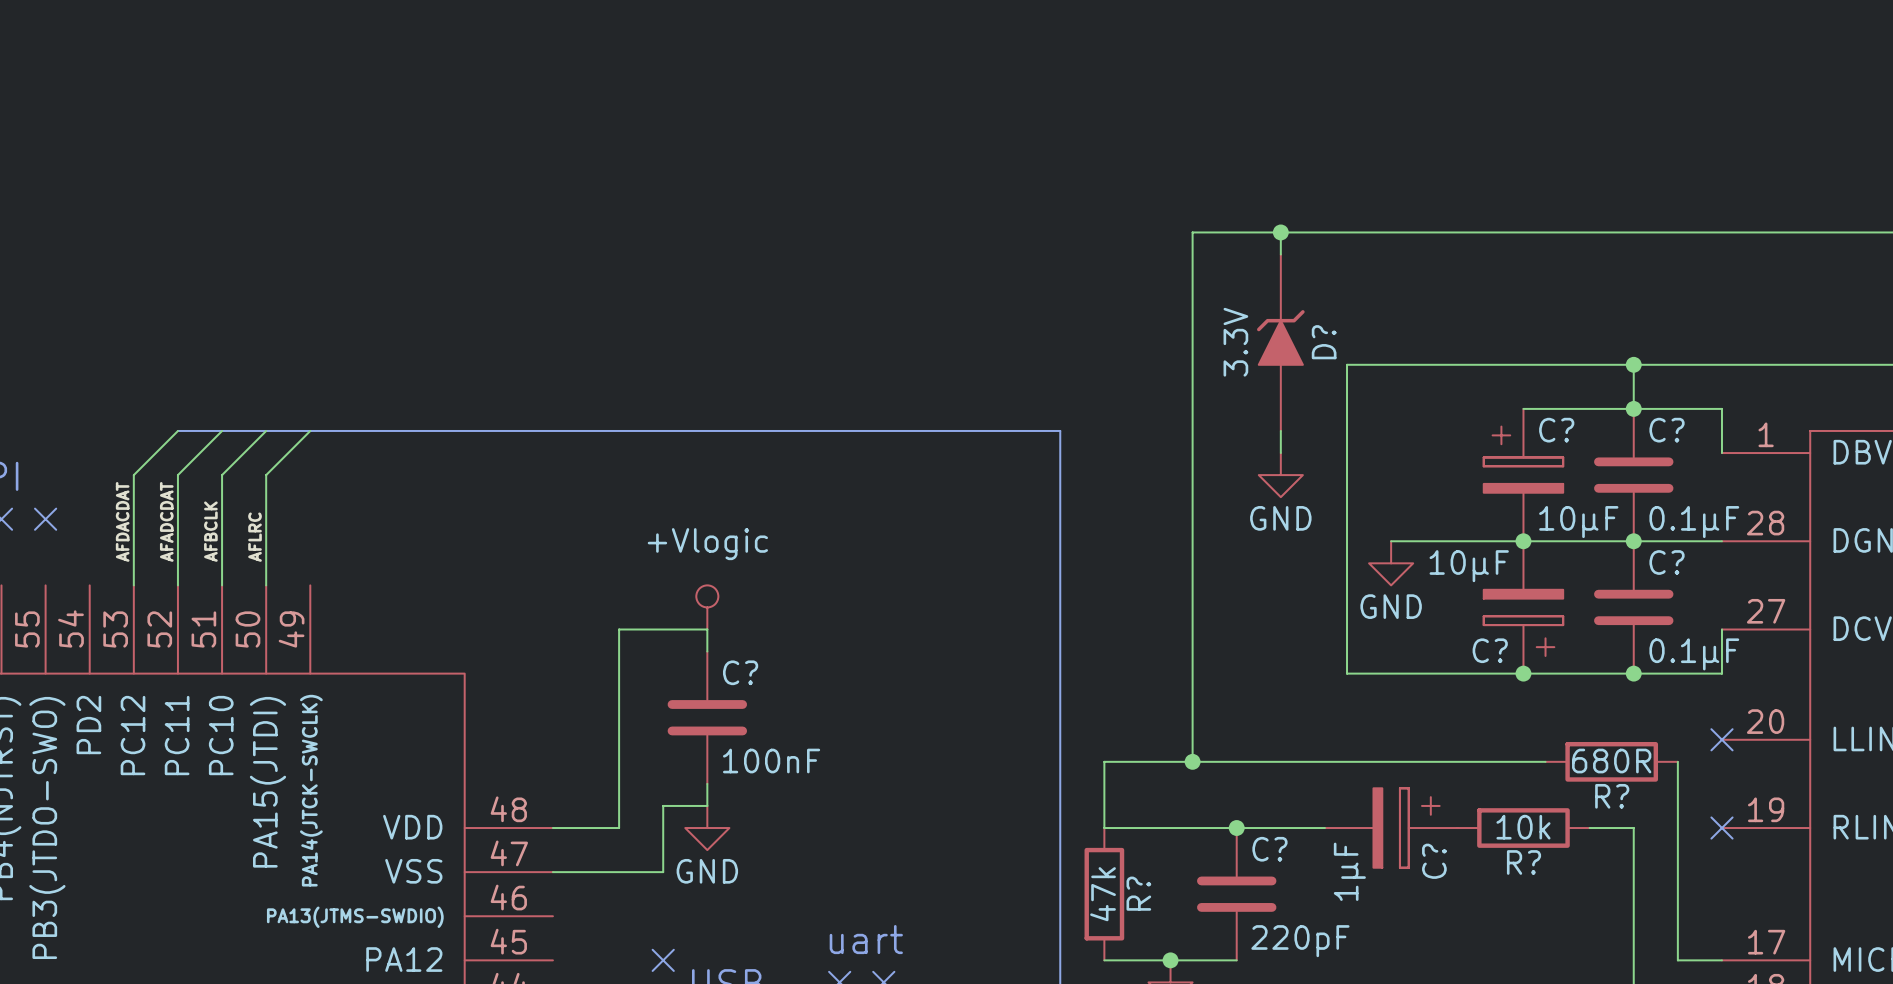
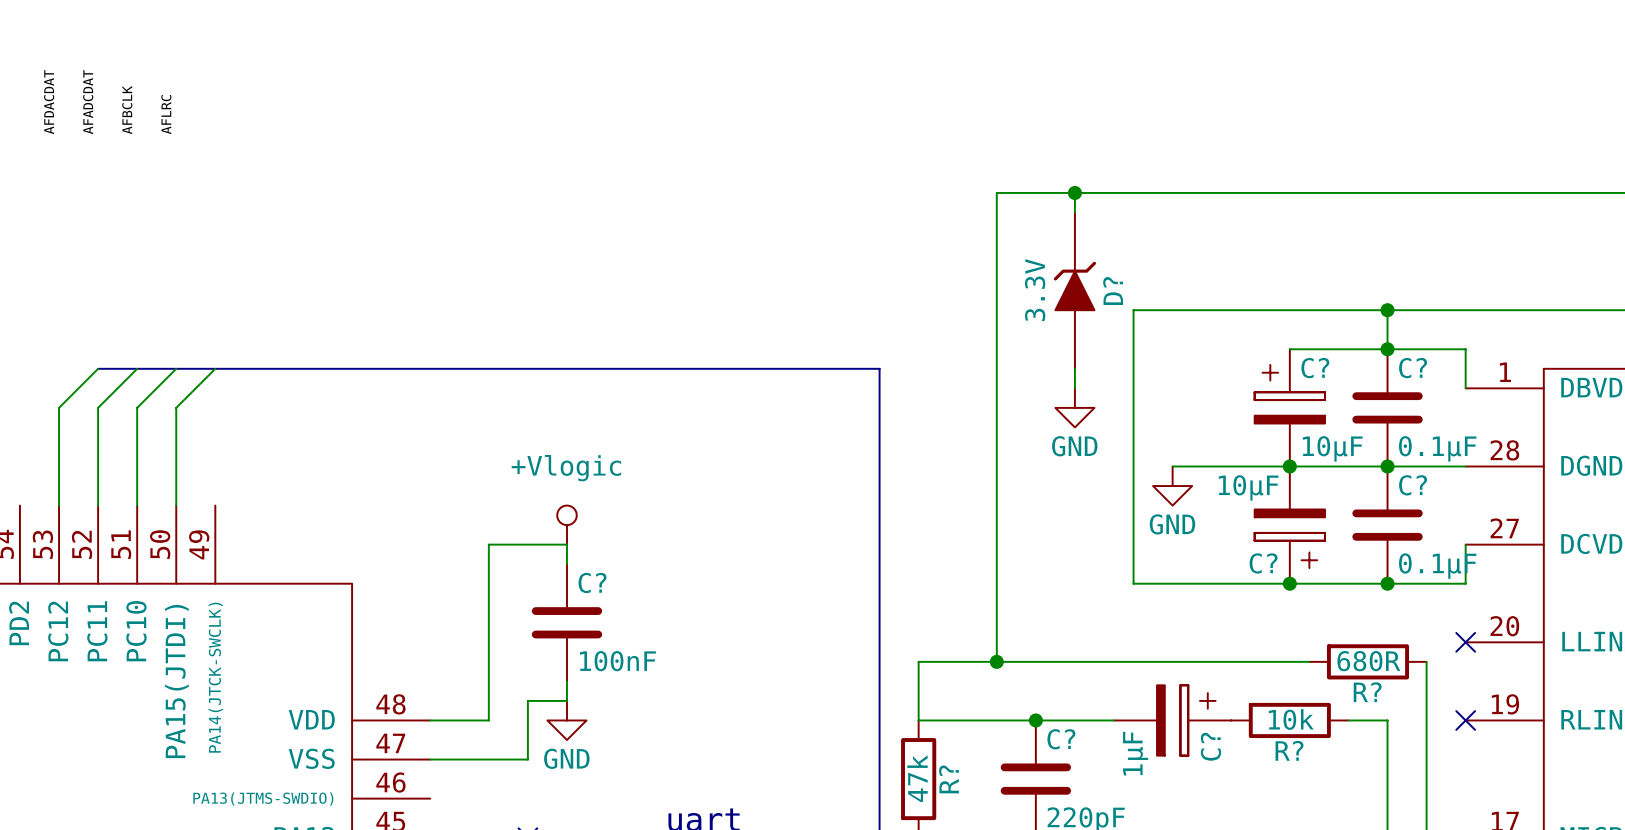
label position: AFDACDAT (122, 521) -> AFDACDAT (49, 102)
label position: AFADCDAT (166, 521) -> AFADCDAT (88, 102)
label position: AFBCLK (210, 531) -> AFBCLK (127, 110)
label position: AFLRC (255, 537) -> AFLRC (166, 114)

